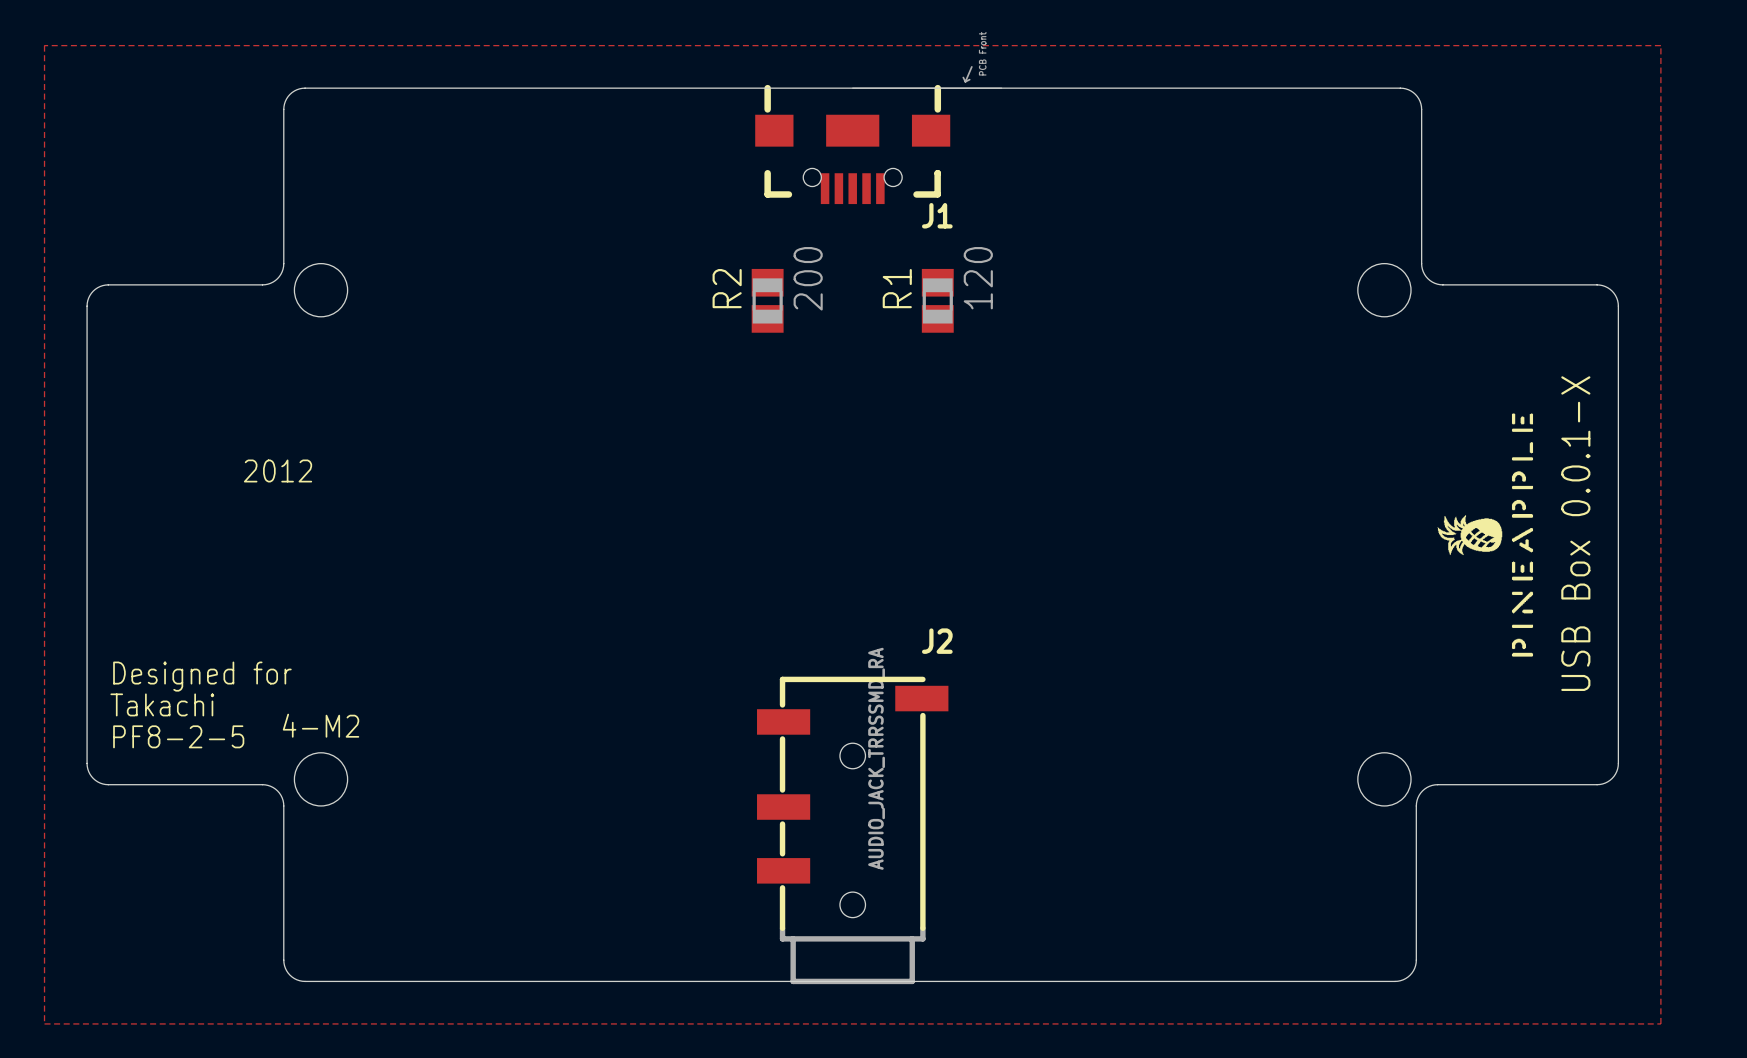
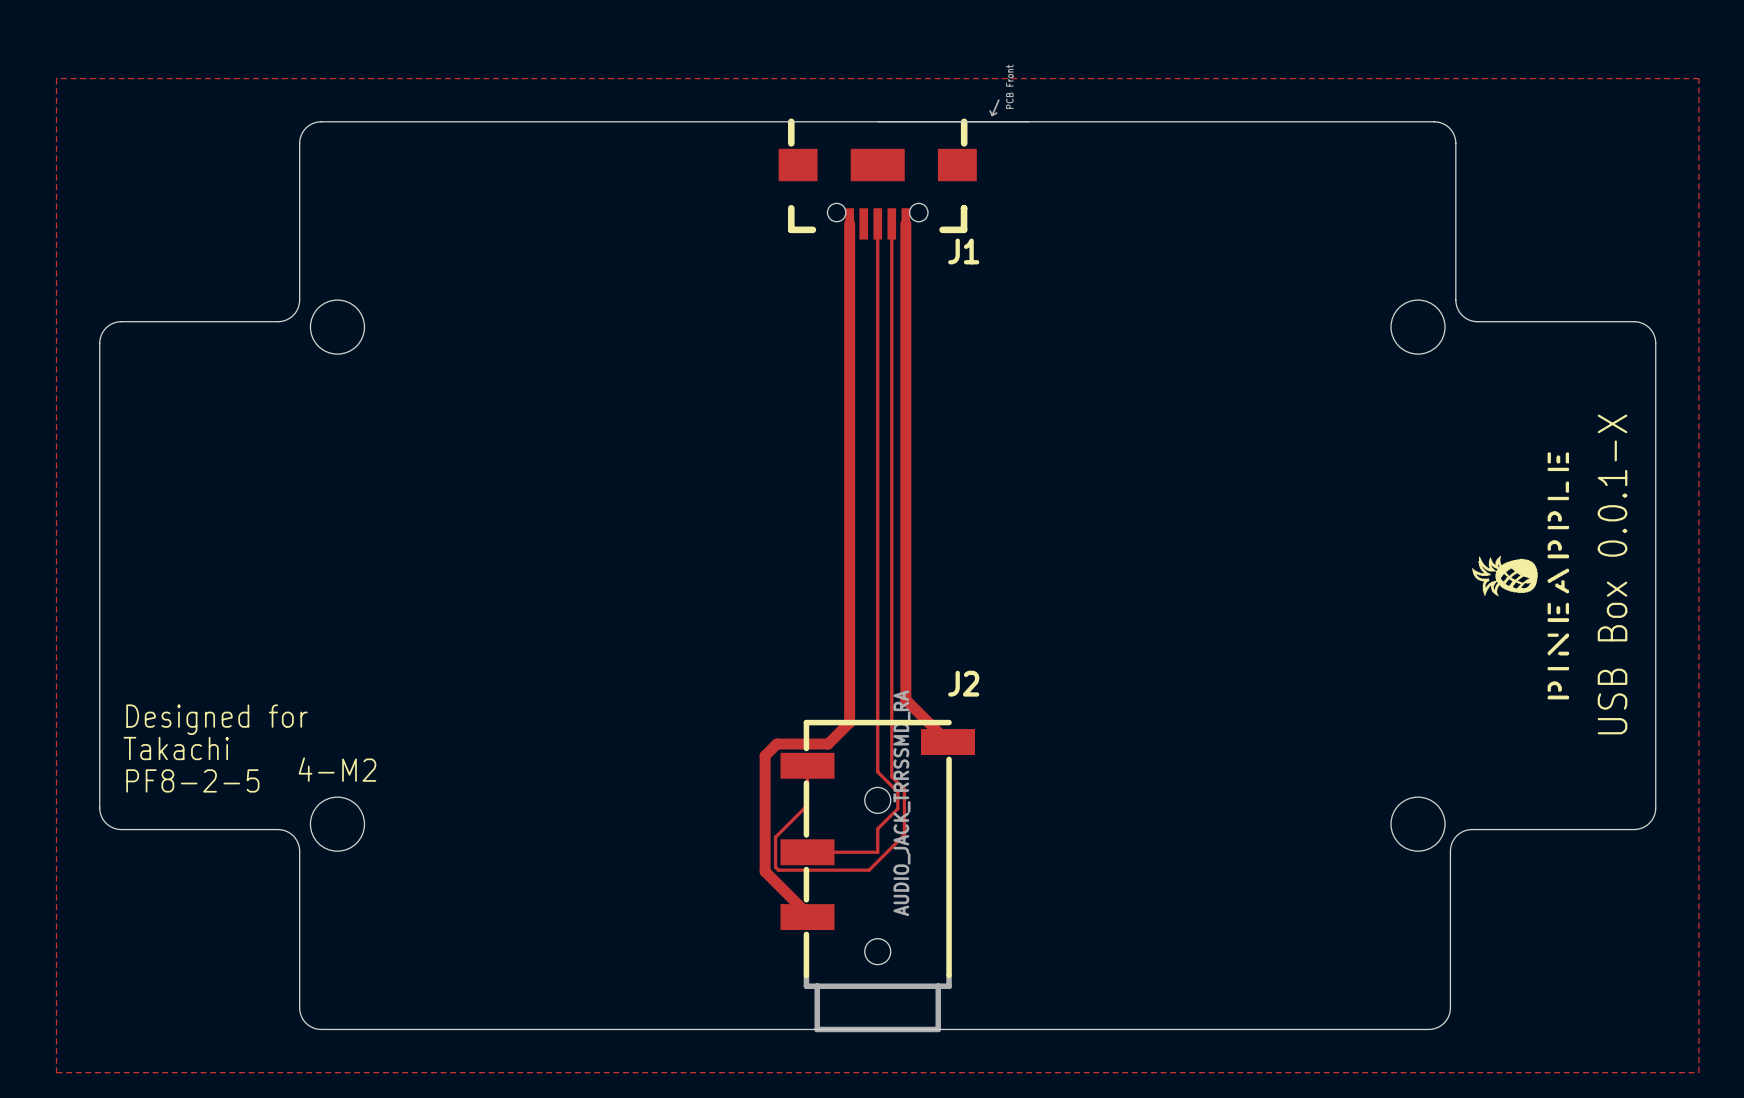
track: none -> (849, 223) (849, 722) (828, 744) (776, 744) (765, 755) (765, 871) (807, 913) (807, 917)
track: none -> (877, 223) (877, 771) (897, 792) (897, 808) (877, 828) (877, 852) (807, 852)
track: none -> (891, 223) (891, 776) (904, 789) (904, 834) (869, 870) (778, 870) (775, 867) (775, 837) (807, 805) (807, 765)
track: none -> (905, 223) (905, 699) (947, 742)
R2: 200 (767, 300) -> none
R1: 120 (937, 300) -> none
text: 2012 (278, 470) -> none

